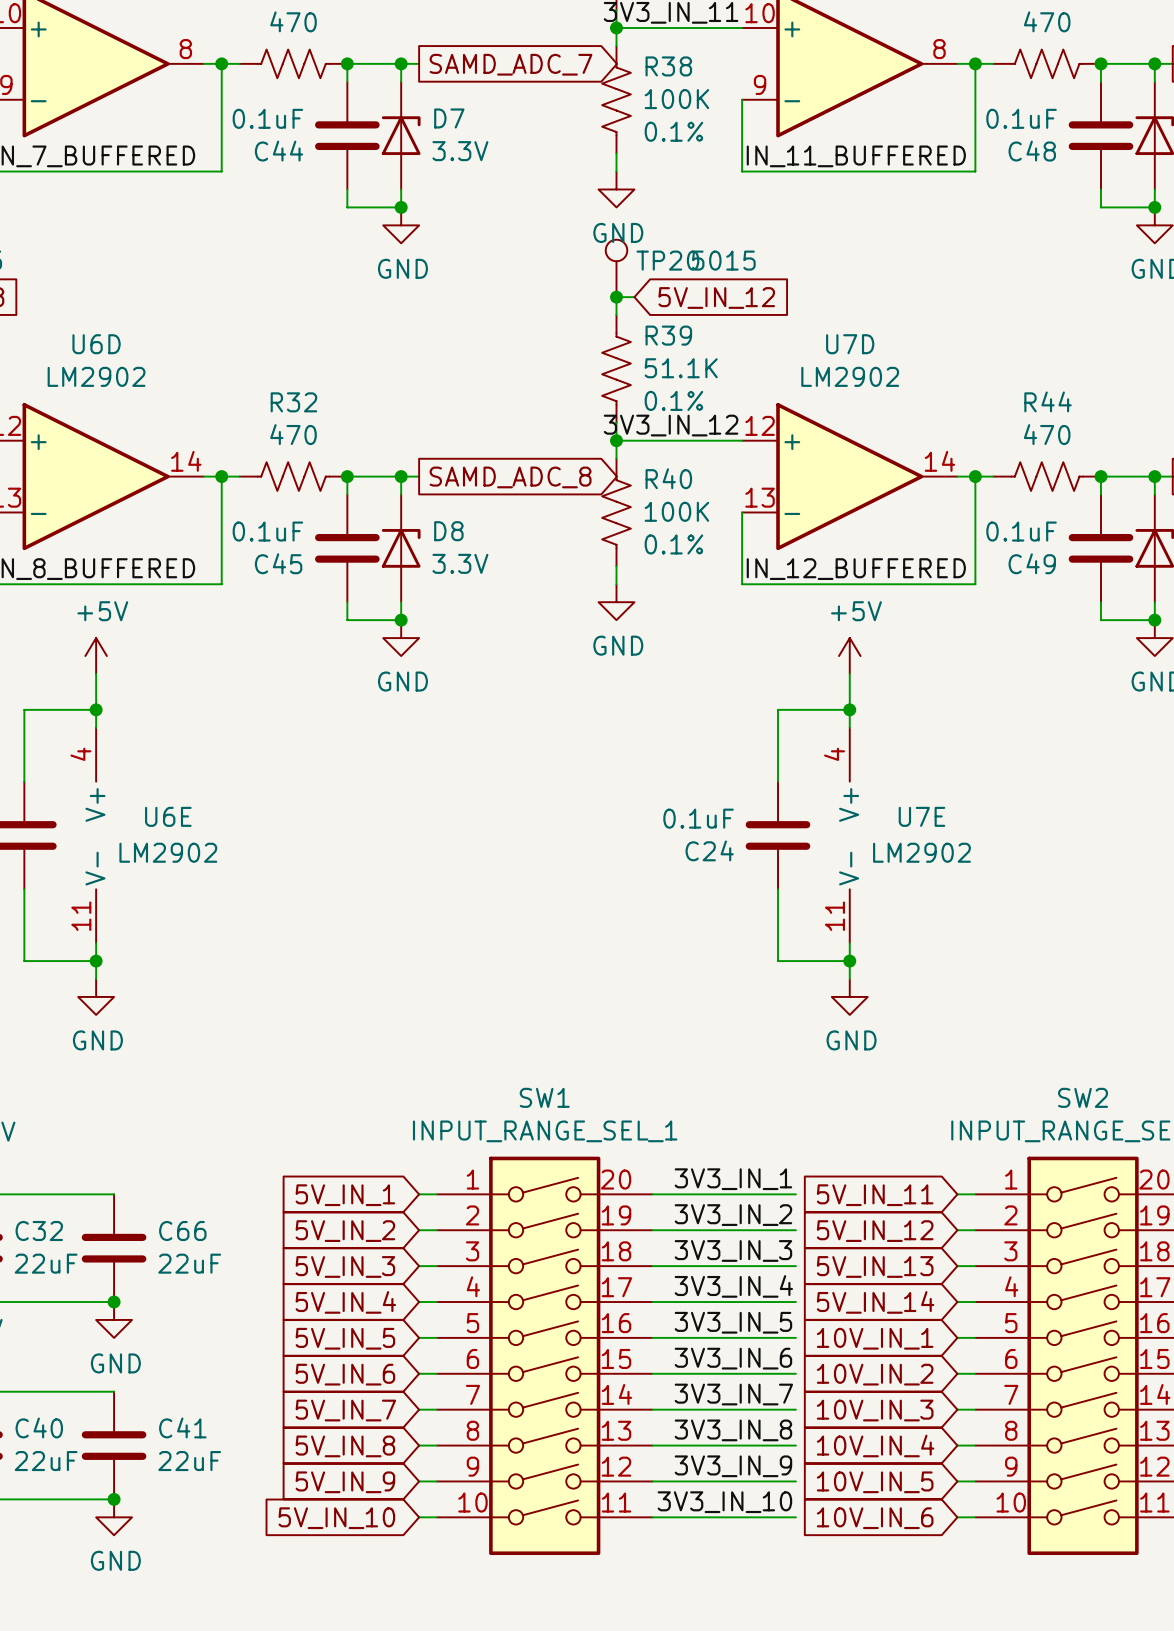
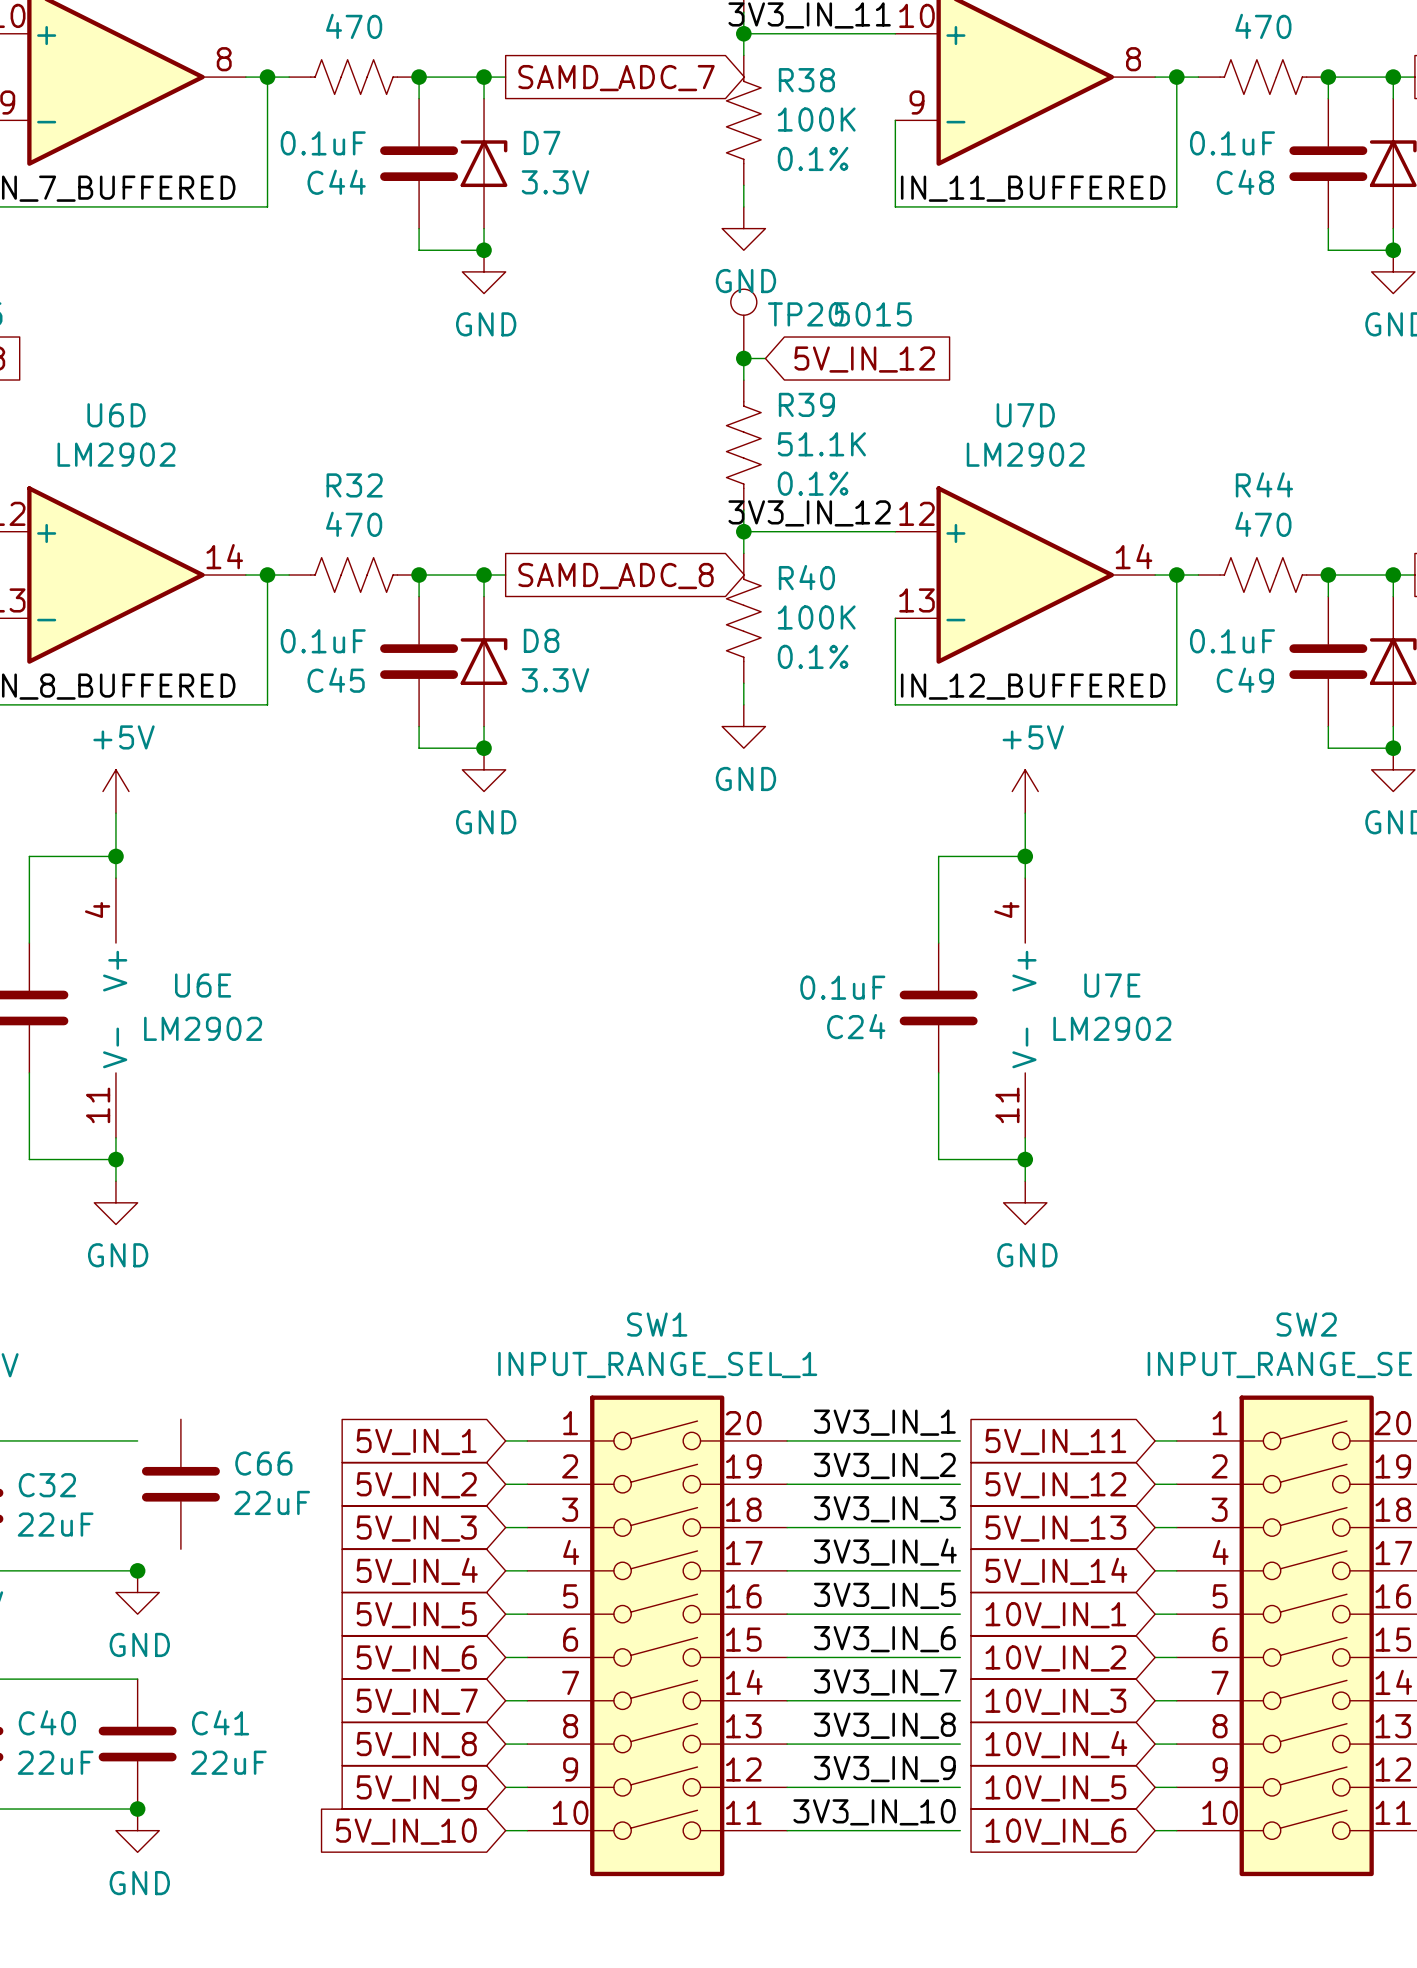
C66 position: (114, 1248) -> (180, 1484)

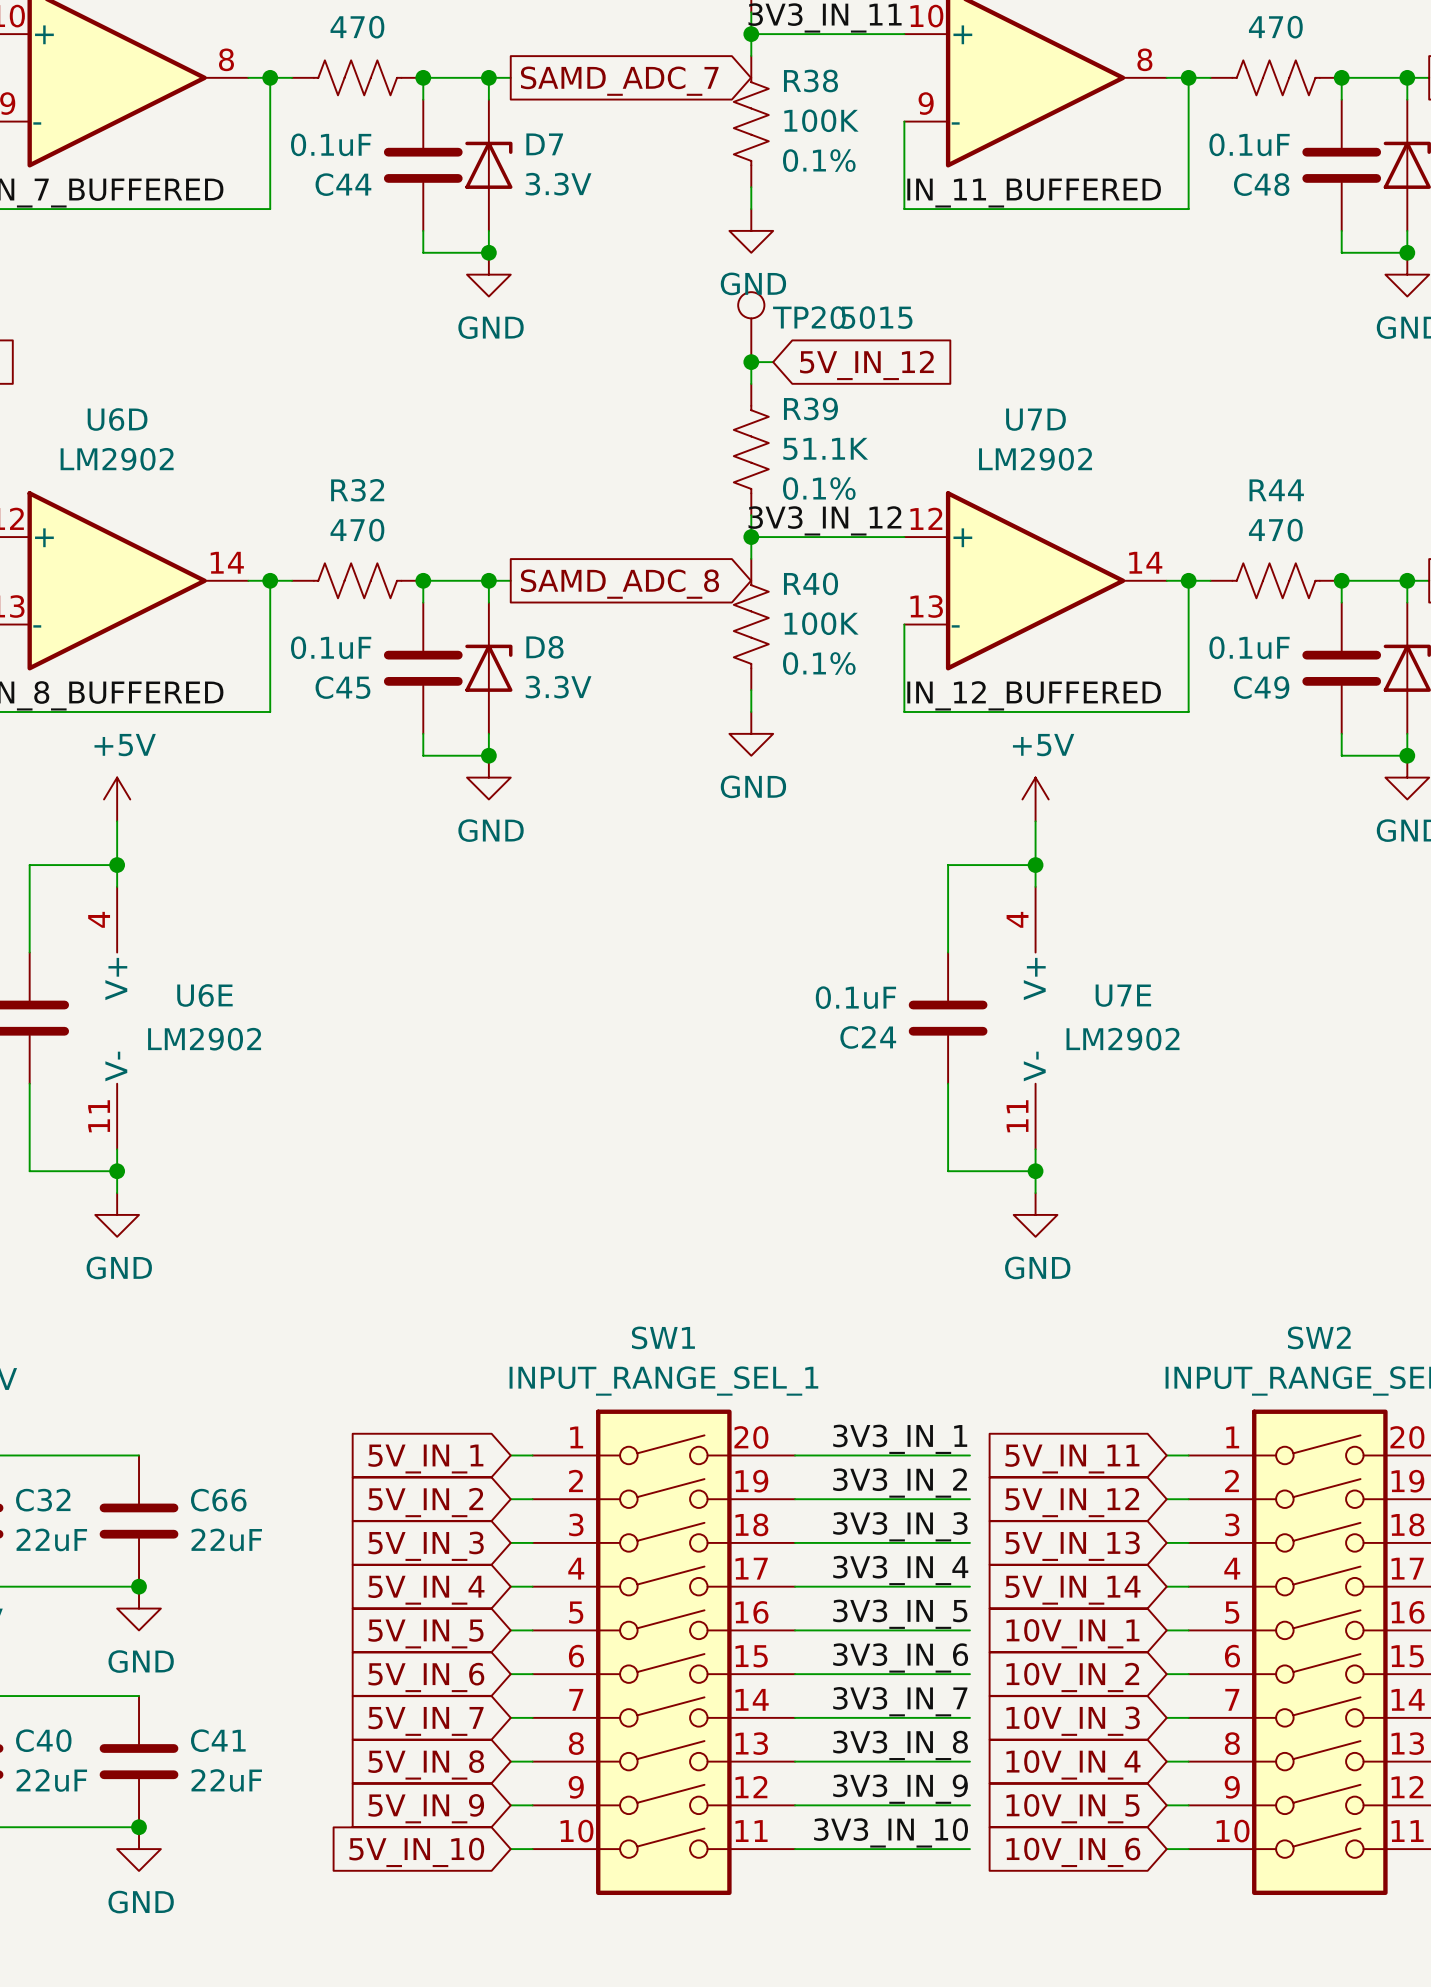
C66 position: (180, 1484) -> (139, 1521)

